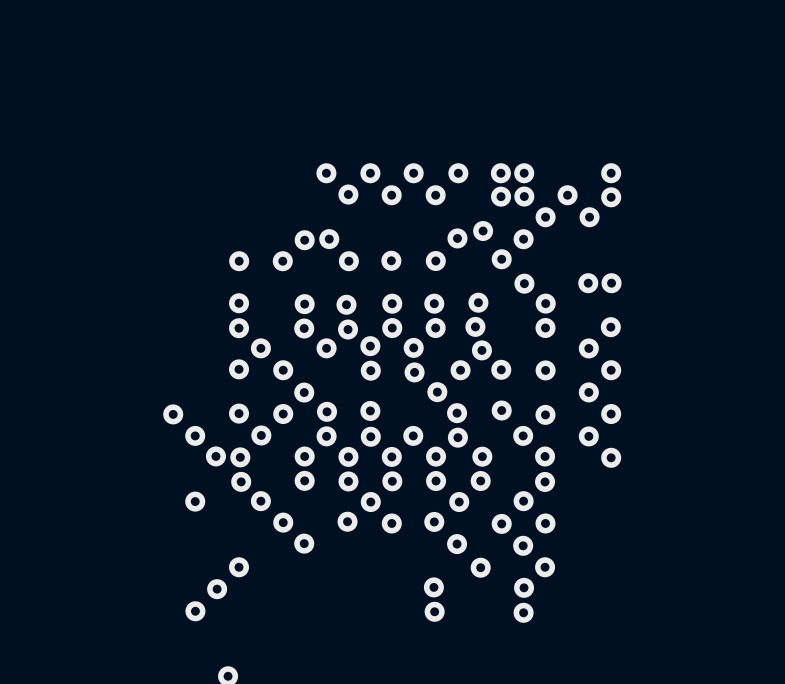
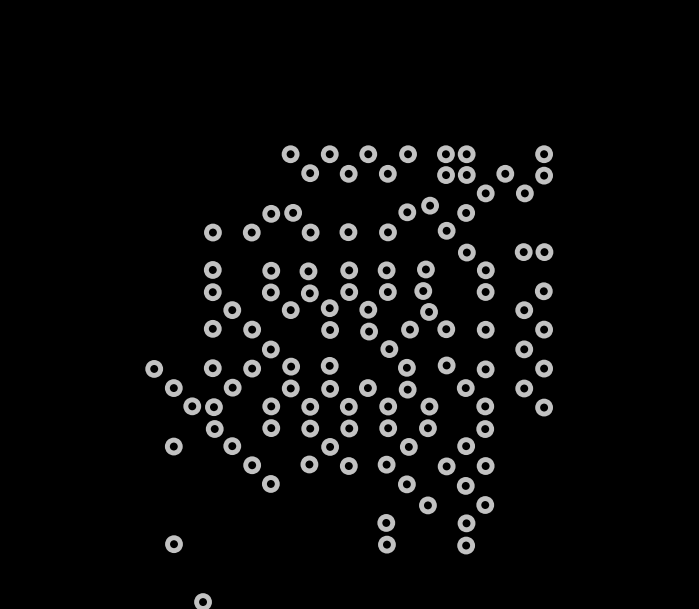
via: (239, 567) -> none
via: (217, 589) -> none

